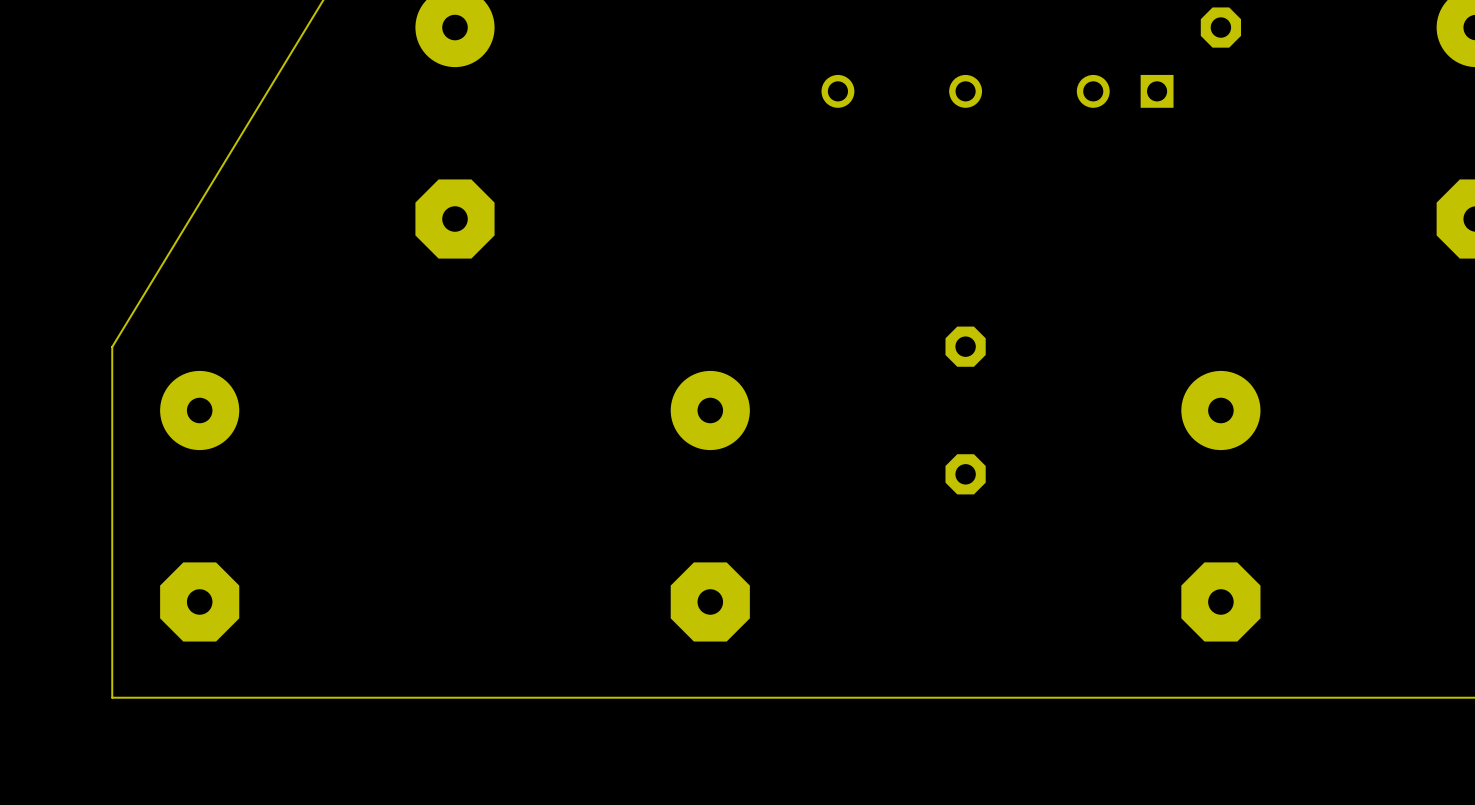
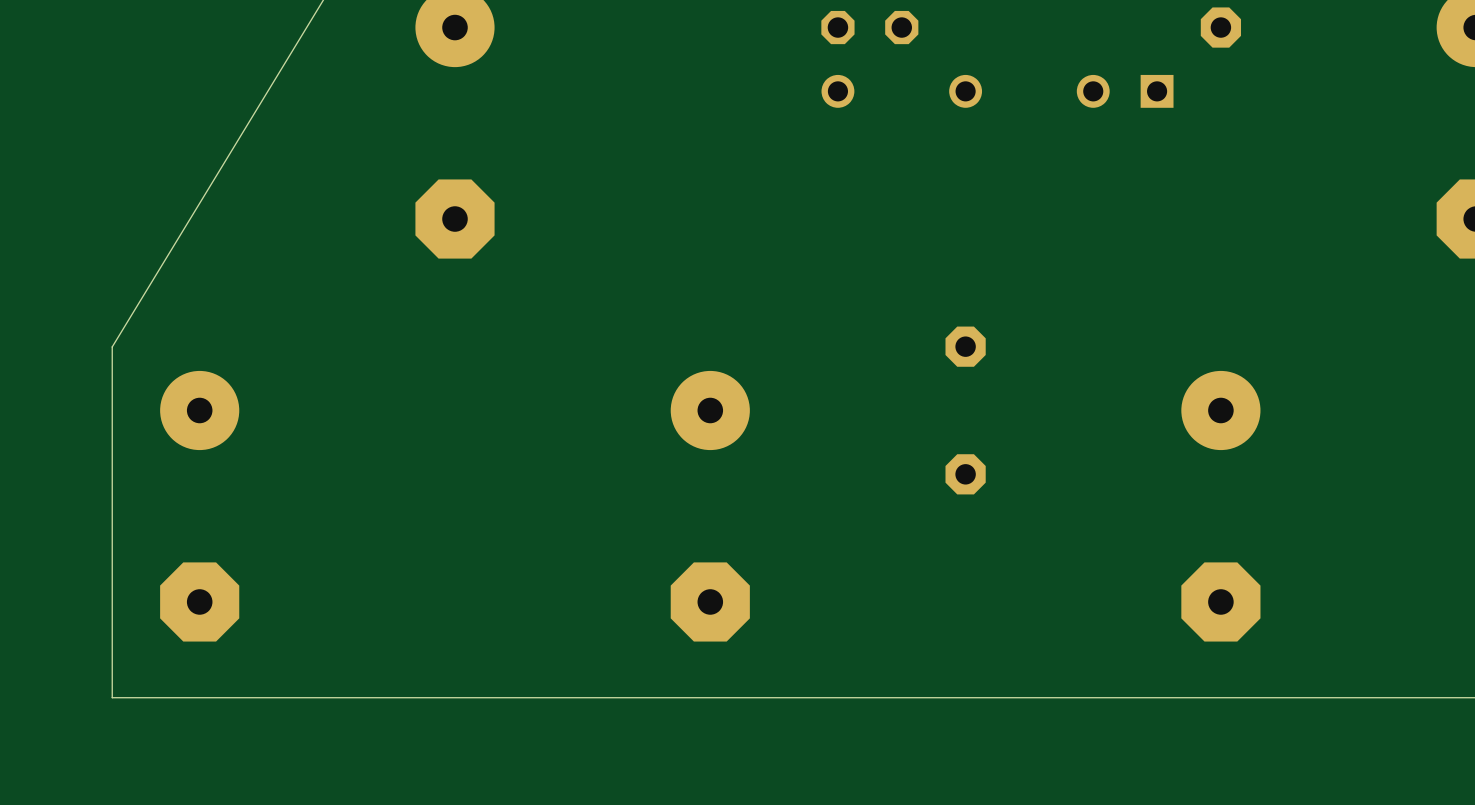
part: none -> (869, 27)

